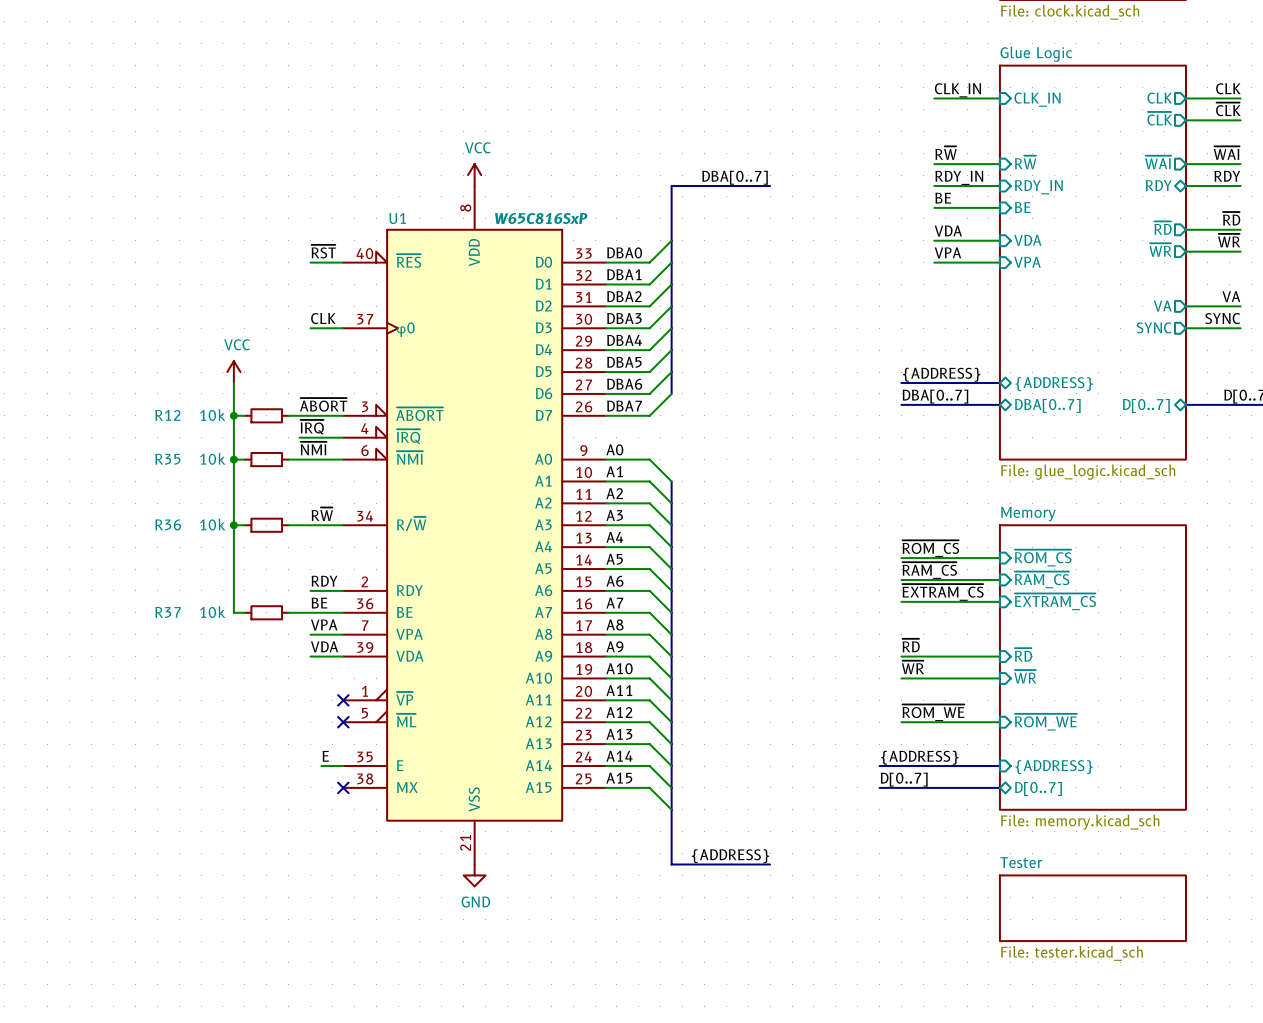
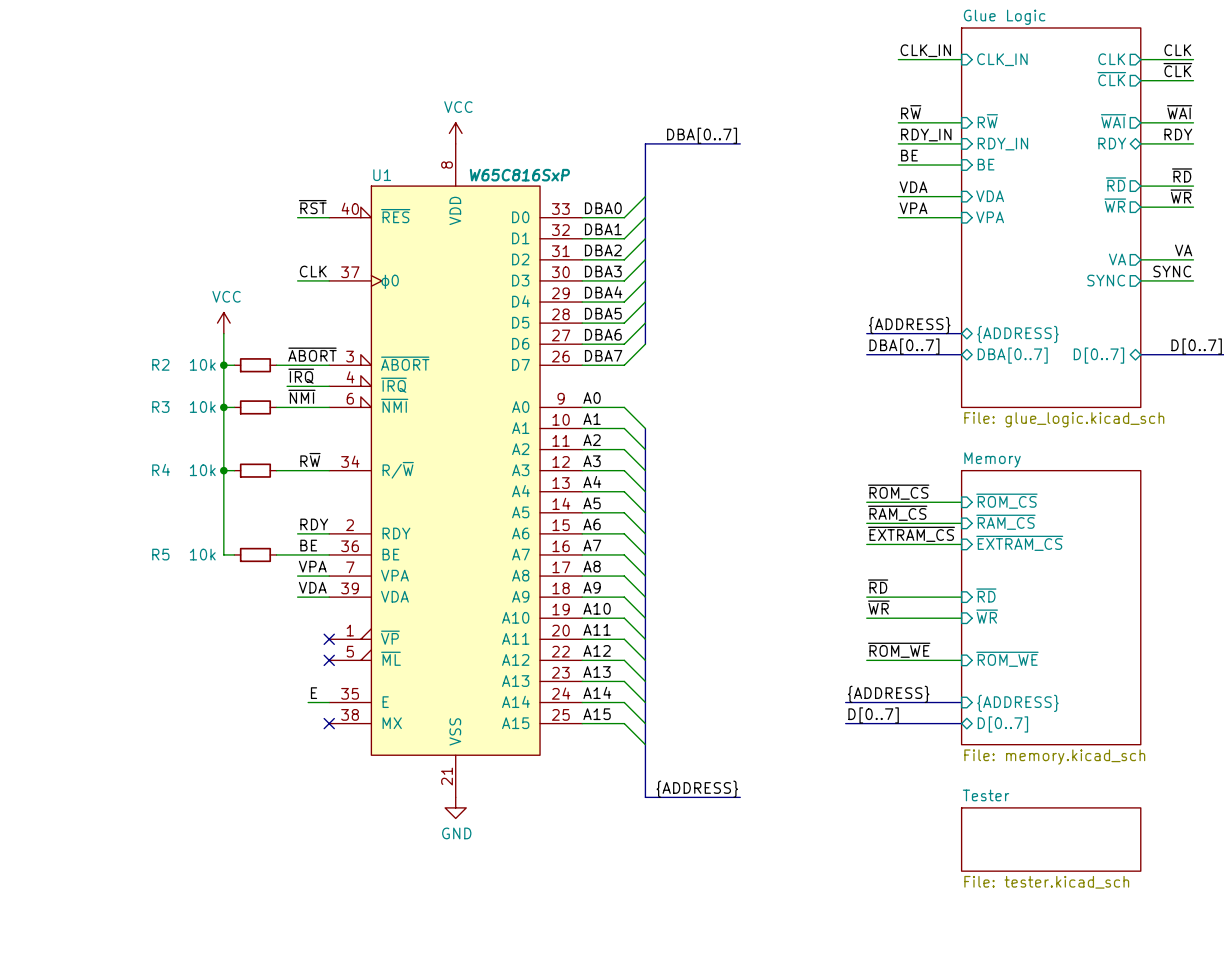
R12 name: R12 (167, 415) -> R2 (160, 364)
R35 name: R35 (167, 459) -> R3 (160, 407)
R36 name: R36 (168, 524) -> R4 (161, 470)
R37 name: R37 (168, 612) -> R5 (160, 554)

